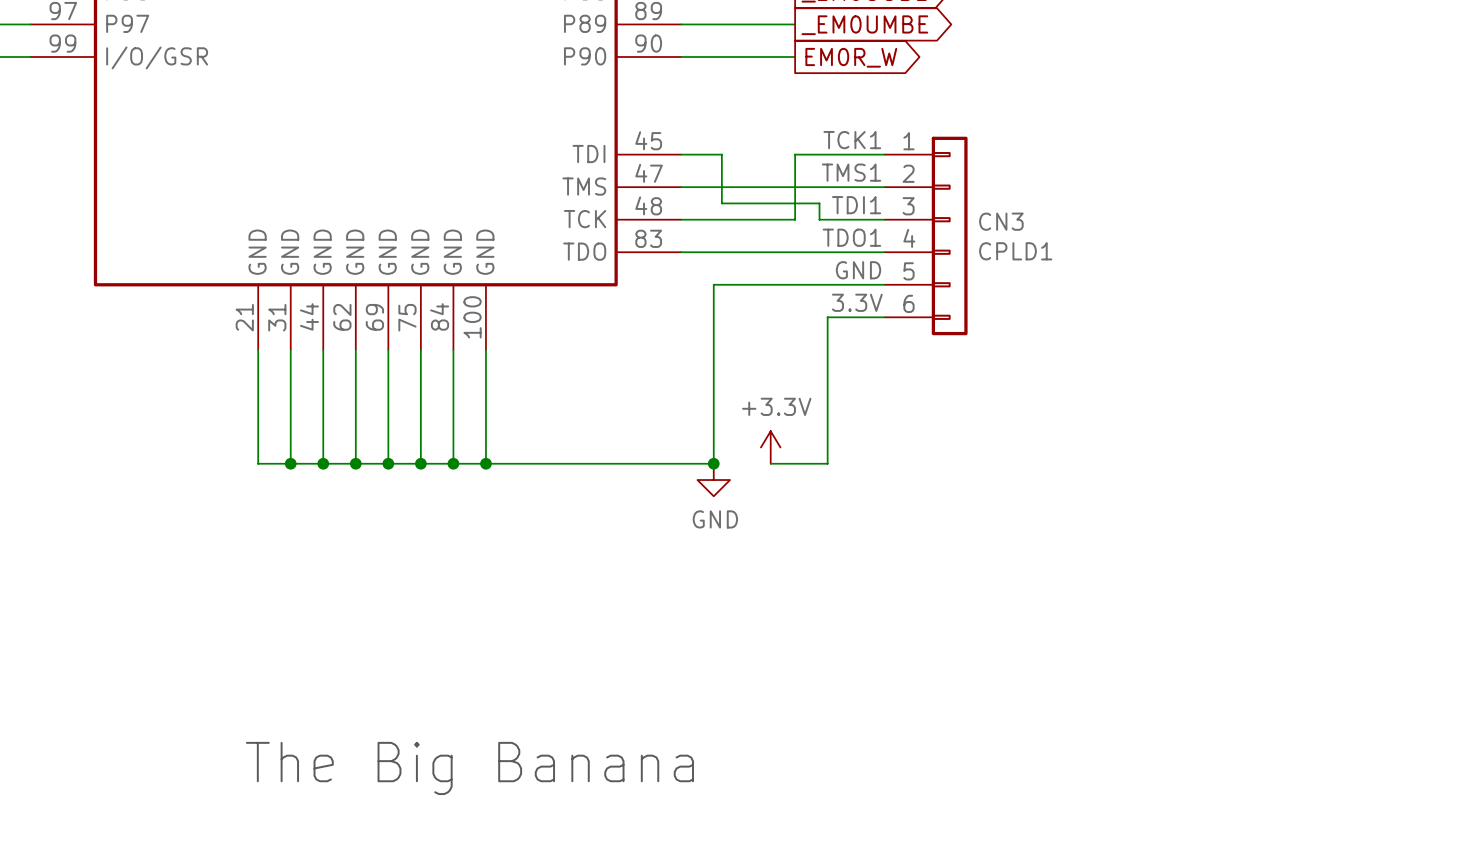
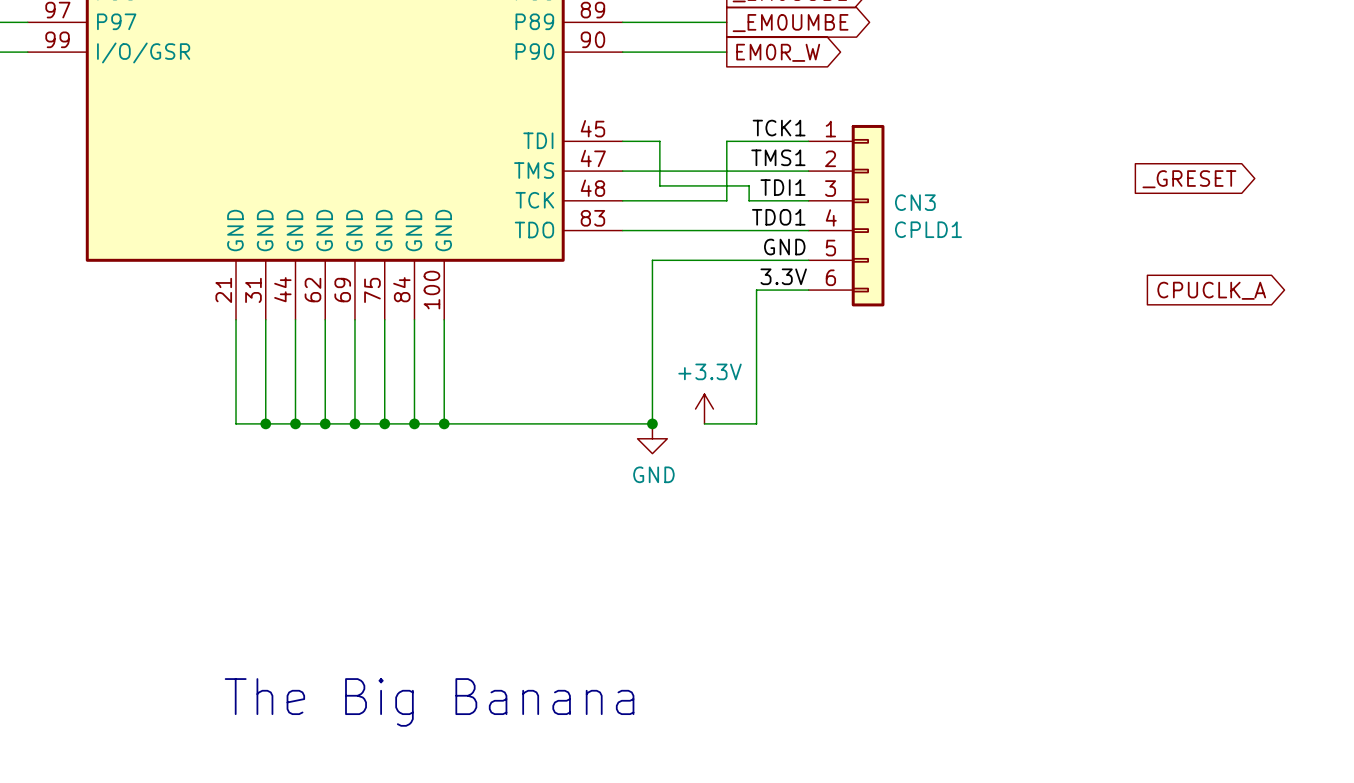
global label: none -> _GRESET (1189, 179)
global label: none -> CPUCLK_A (1211, 290)

